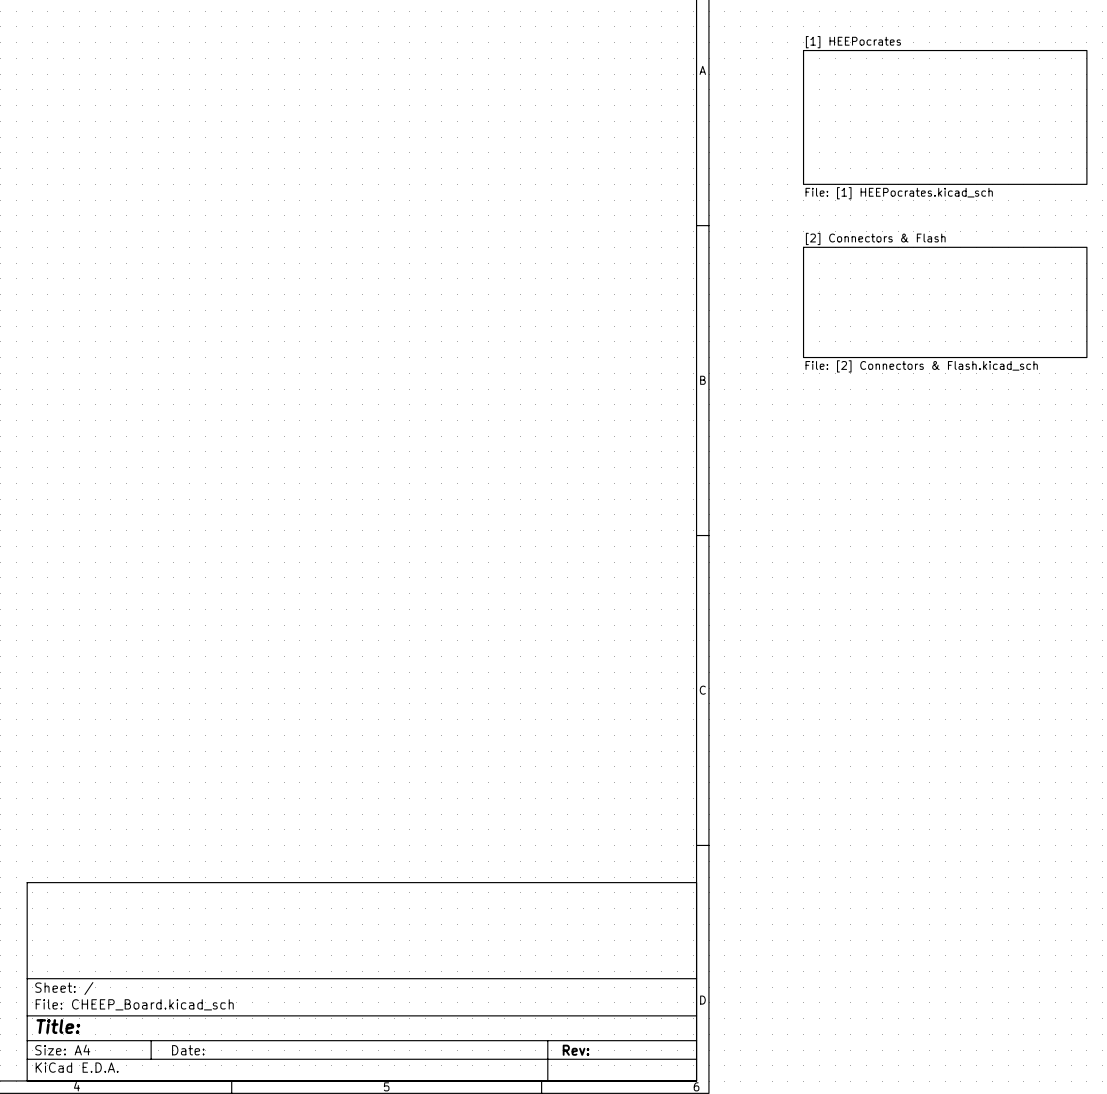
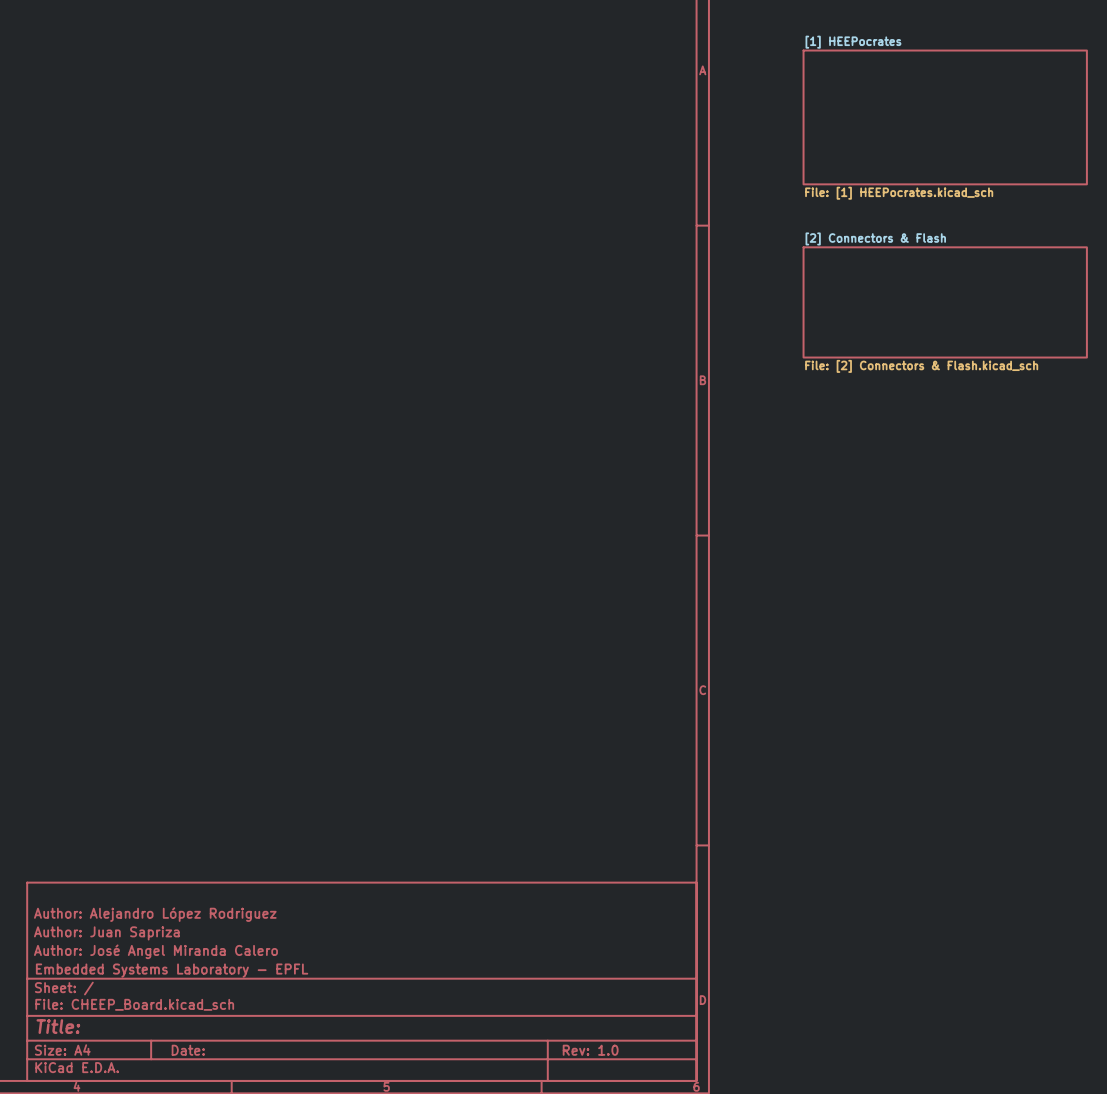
title block: none -> Author: Alejandro López Rodriguez (155, 914)
title block: none -> Author: Juan Sapriza (106, 933)
title block: none -> Author: José Angel Miranda Calero (155, 951)
title block: none -> Embedded Systems Laboratory - EPFL (172, 970)
title block: Rev: (576, 1050) -> Rev: 1.0 (590, 1050)

